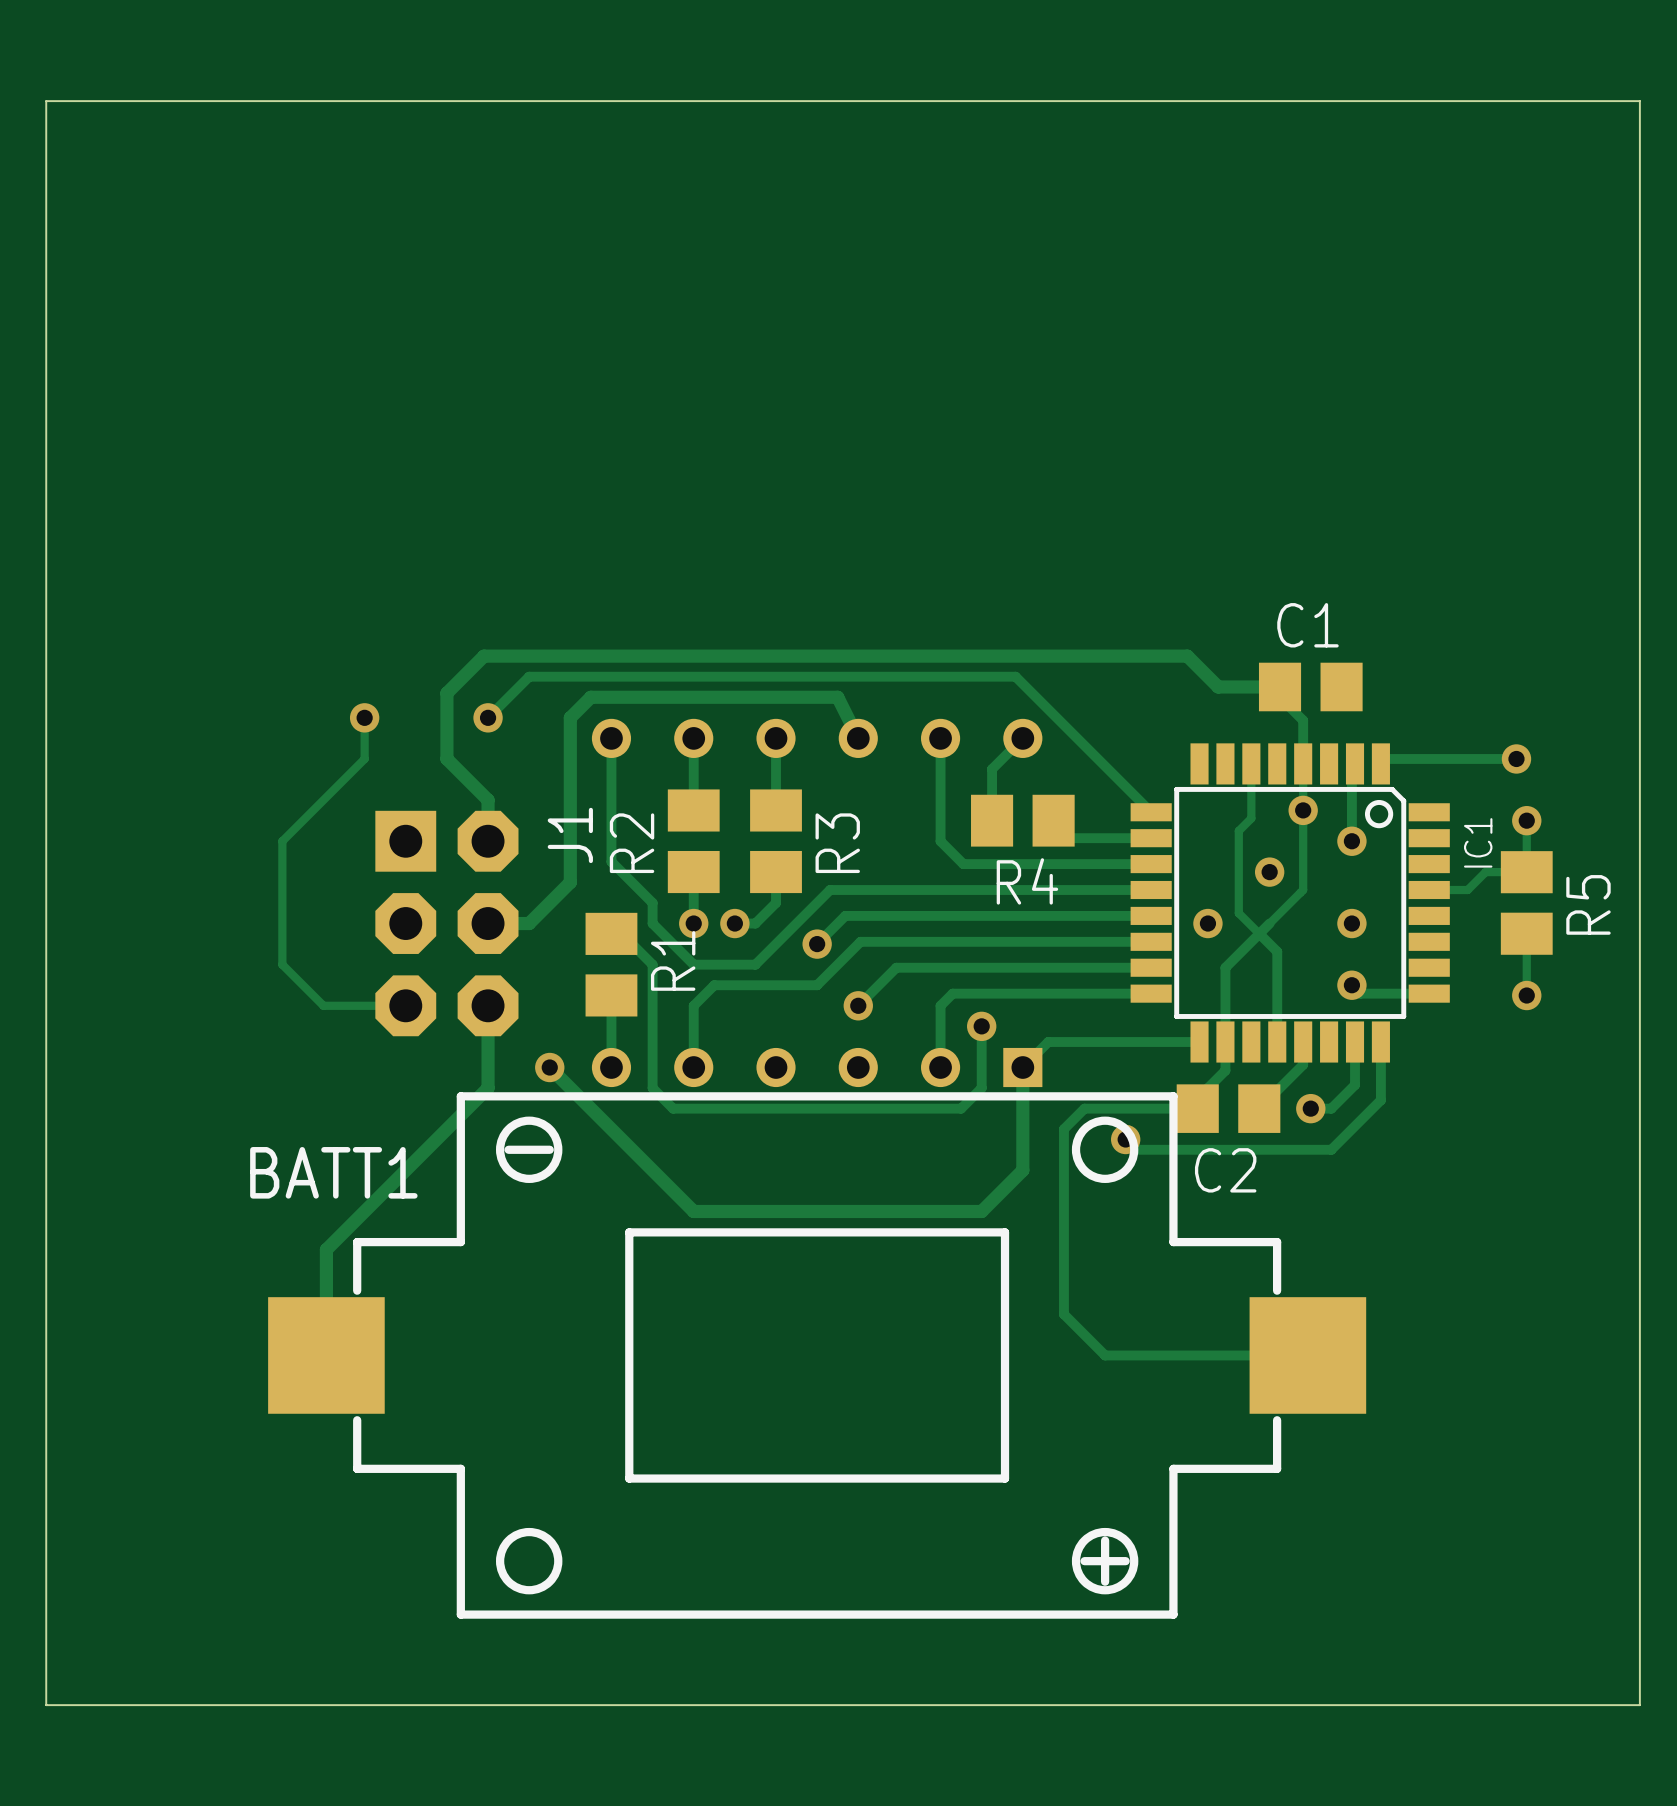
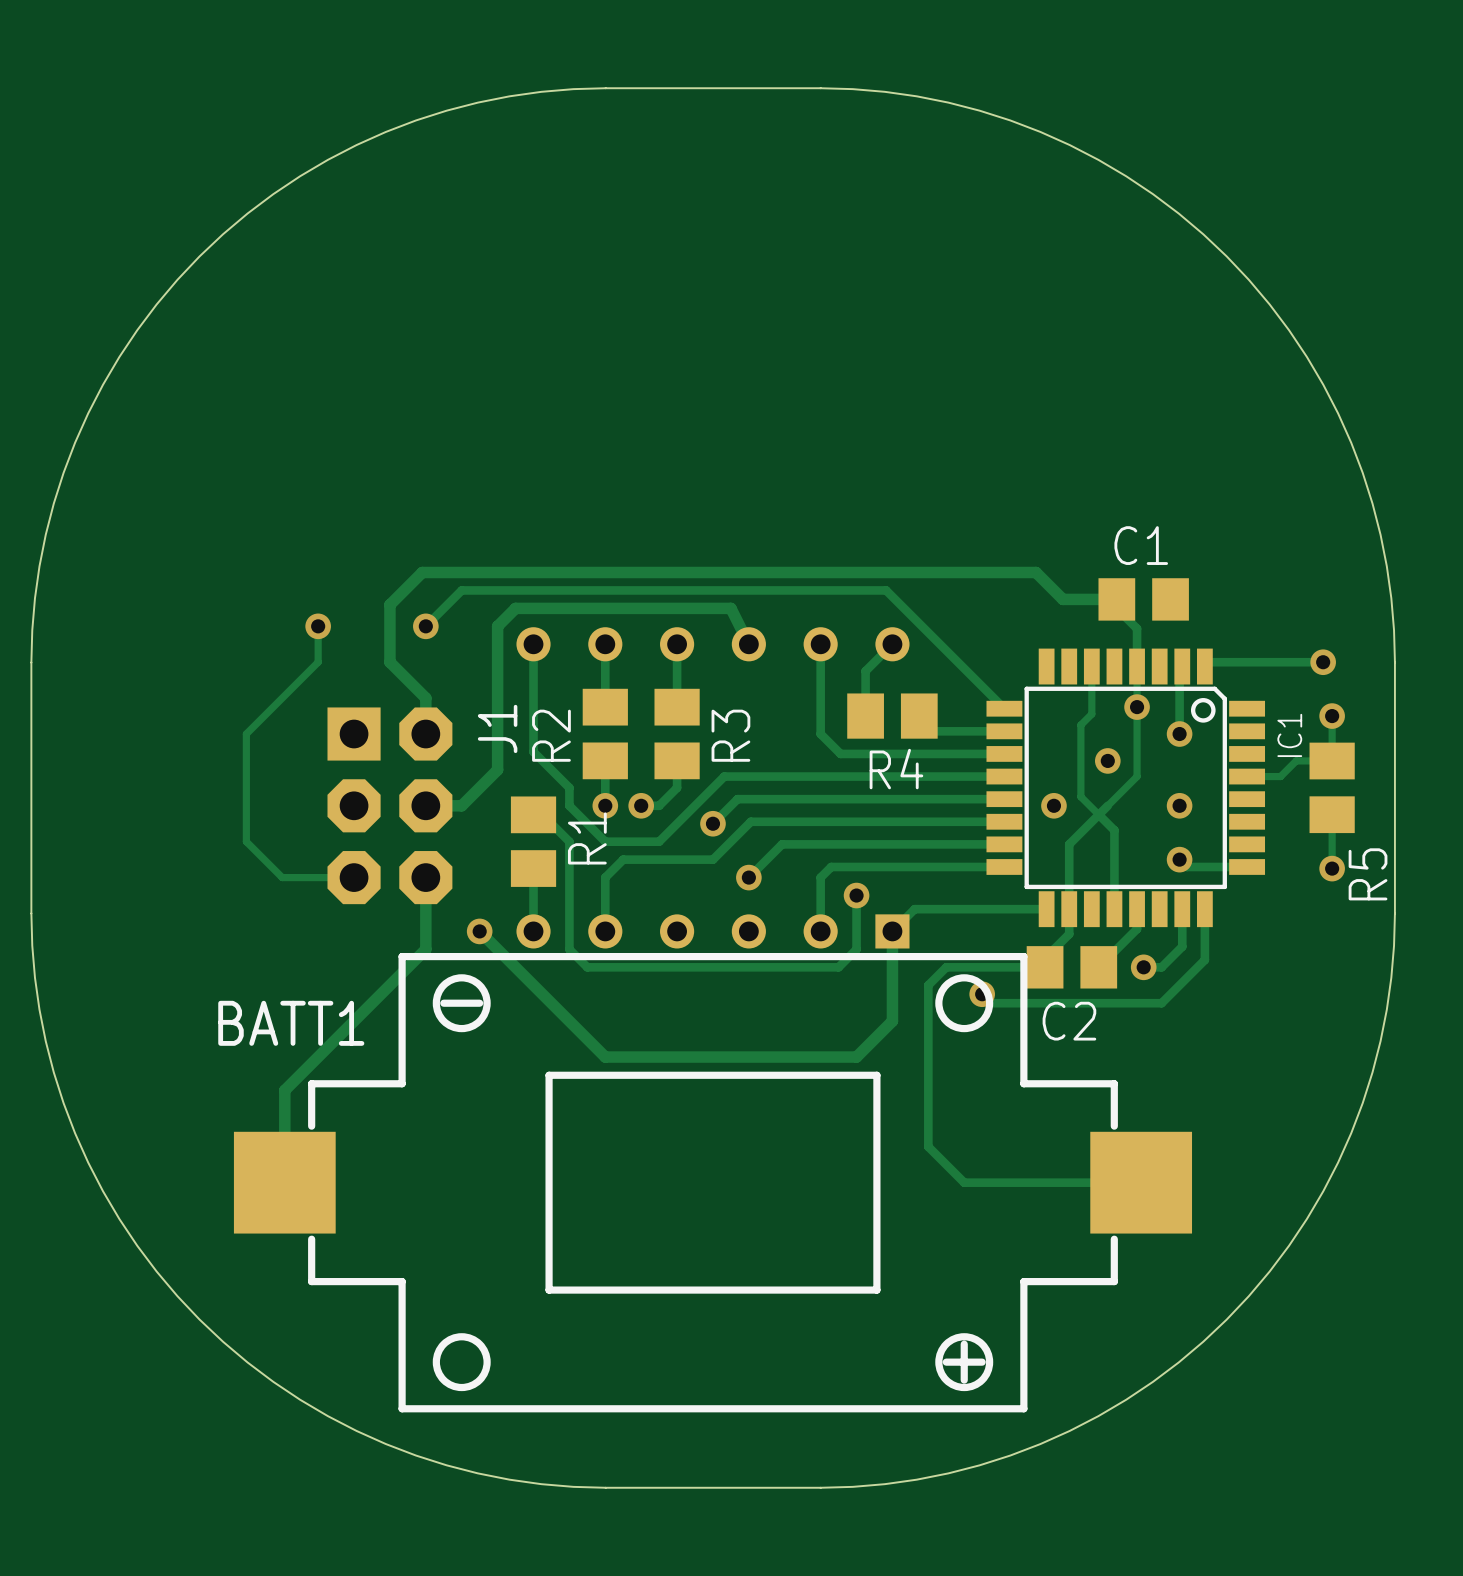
board edge: (694, 101) (46, 101) (46, 1705) (694, 1705) -> (605, 88) (573, 89) (509, 96) (446, 110) (385, 131) (327, 159) (273, 194) (222, 234) (199, 256) (177, 279) (137, 330) (103, 384) (75, 442) (53, 503) (39, 566) (32, 630) (31, 662) (31, 913) (32, 945) (39, 1009) (53, 1072) (75, 1133) (103, 1191) (137, 1245) (177, 1296) (222, 1341) (273, 1381) (327, 1416) (356, 1430) (415, 1455) (477, 1473) (541, 1484) (605, 1487)
board edge: (940, 101) (1639, 101) (1639, 1705) (940, 1705) -> (820, 88) (852, 89) (916, 96) (979, 110) (1040, 131) (1098, 159) (1152, 194) (1203, 234) (1226, 256) (1248, 279) (1289, 330) (1323, 384) (1351, 442) (1372, 503) (1386, 566) (1394, 630) (1394, 662) (1394, 913) (1394, 945) (1386, 1009) (1372, 1072) (1351, 1133) (1323, 1191) (1289, 1245) (1248, 1296) (1203, 1341) (1152, 1381) (1098, 1416) (1069, 1430) (1010, 1455) (948, 1473) (884, 1484) (820, 1487)
R5 name position: R5 (1588, 904) -> R5 (1368, 874)

